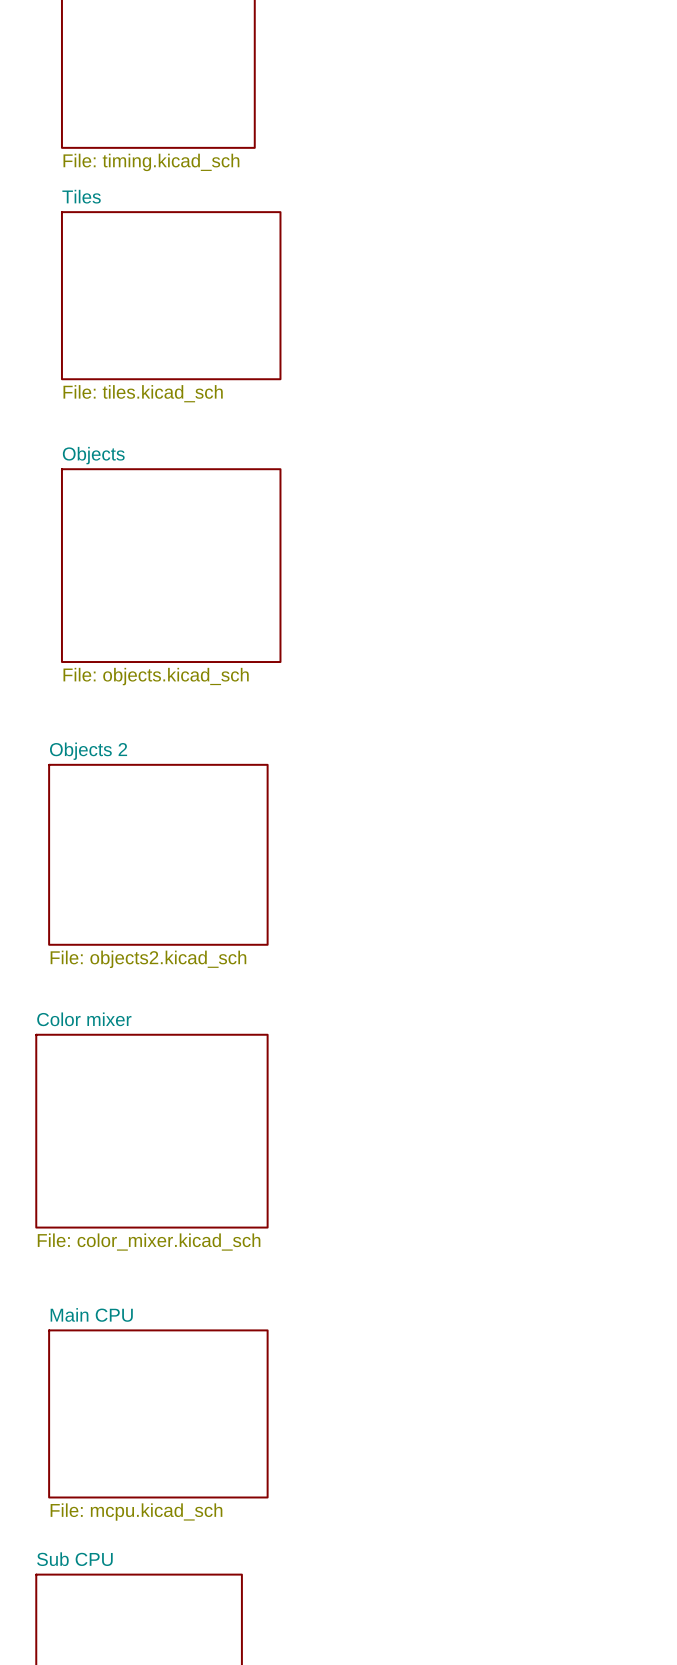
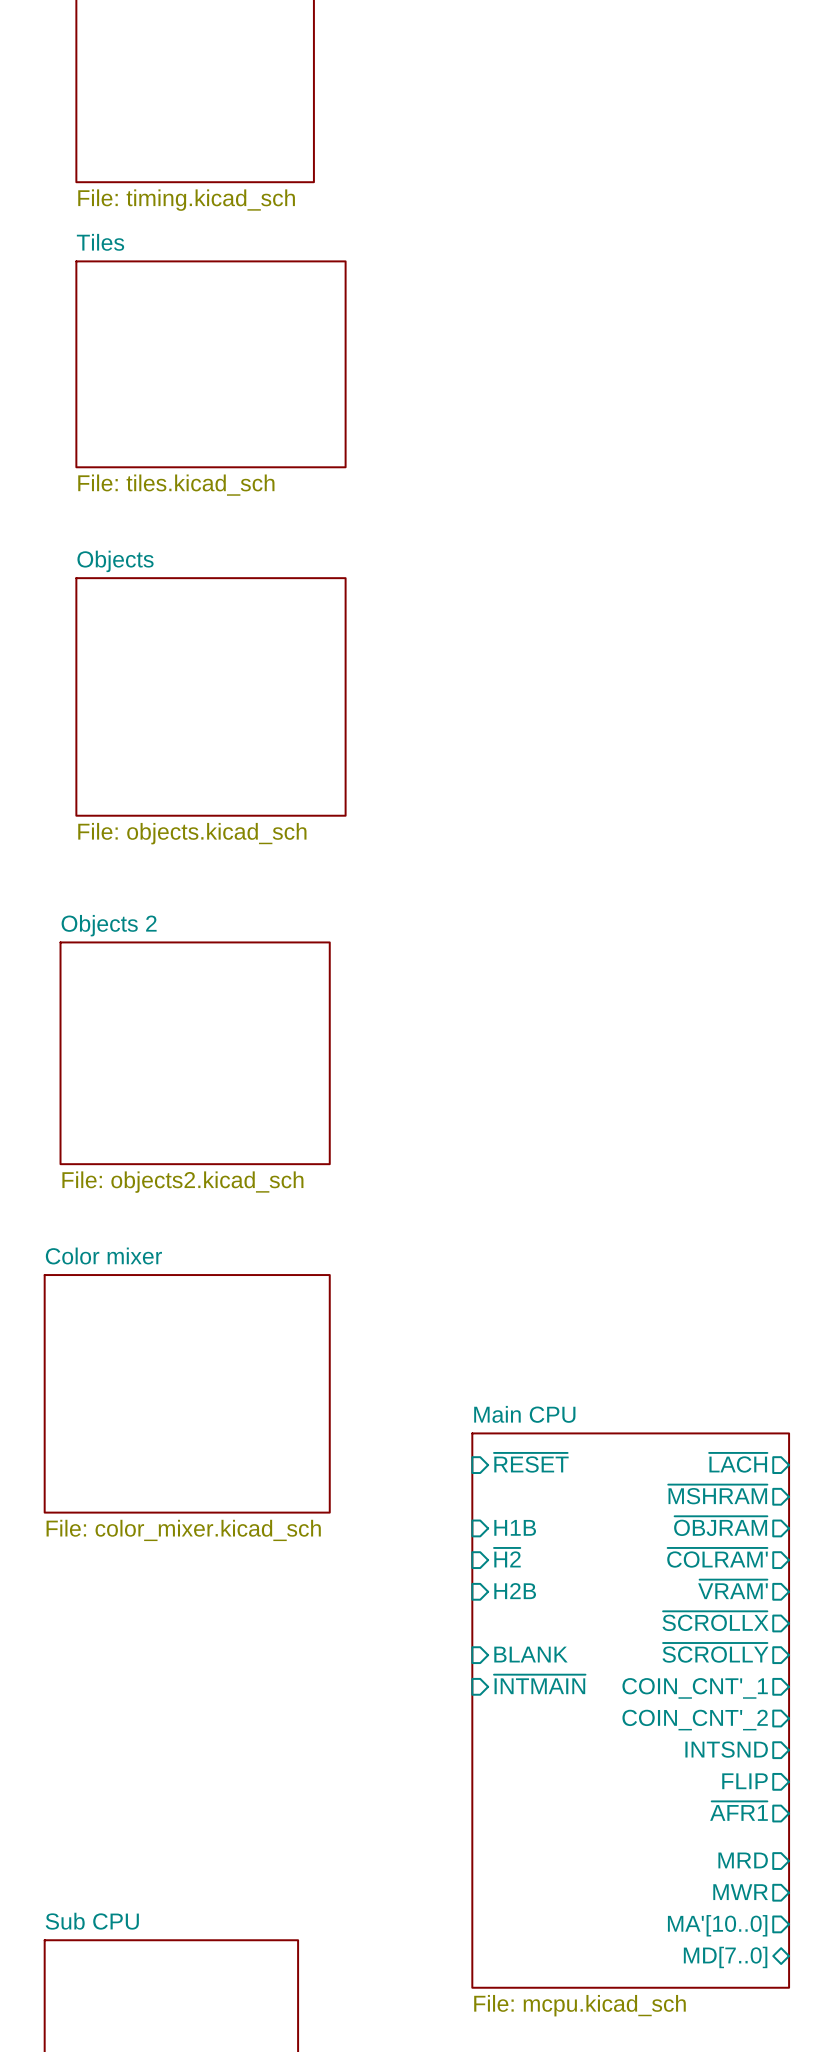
sheet pin: none -> ~{RESET} (531, 1462)
sheet pin: none -> ~{LACH} (738, 1462)
sheet pin: none -> ~{MSHRAM} (717, 1494)
sheet pin: none -> ~{OBJRAM} (720, 1526)
sheet pin: none -> H1B (515, 1527)
sheet pin: none -> ~{H2} (507, 1557)
sheet pin: none -> ~{COLRAM'} (717, 1557)
sheet pin: none -> ~{VRAM'} (732, 1589)
sheet pin: none -> H2B (515, 1591)
sheet pin: none -> ~{SCROLLX} (715, 1621)
sheet pin: none -> ~{SCROLLY} (715, 1652)
sheet pin: none -> BLANK (530, 1654)
sheet pin: none -> ~{INTMAIN} (539, 1684)
sheet pin: none -> COIN_CNT'_1 (695, 1688)
sheet Main CPU: none -> File: mcpu.kicad_sch (630, 1710)
sheet pin: none -> COIN_CNT'_2 (695, 1720)
sheet Main CPU: File: mcpu.kicad_sch (158, 1413) -> none
sheet pin: none -> INTSND (726, 1749)
sheet pin: none -> FLIP (744, 1781)
sheet pin: none -> ~{AFR1} (739, 1811)
sheet pin: none -> MRD (743, 1860)
sheet pin: none -> MWR (740, 1892)
sheet pin: none -> MA'[10..0] (717, 1925)
sheet pin: none -> MD[7..0] (725, 1957)

